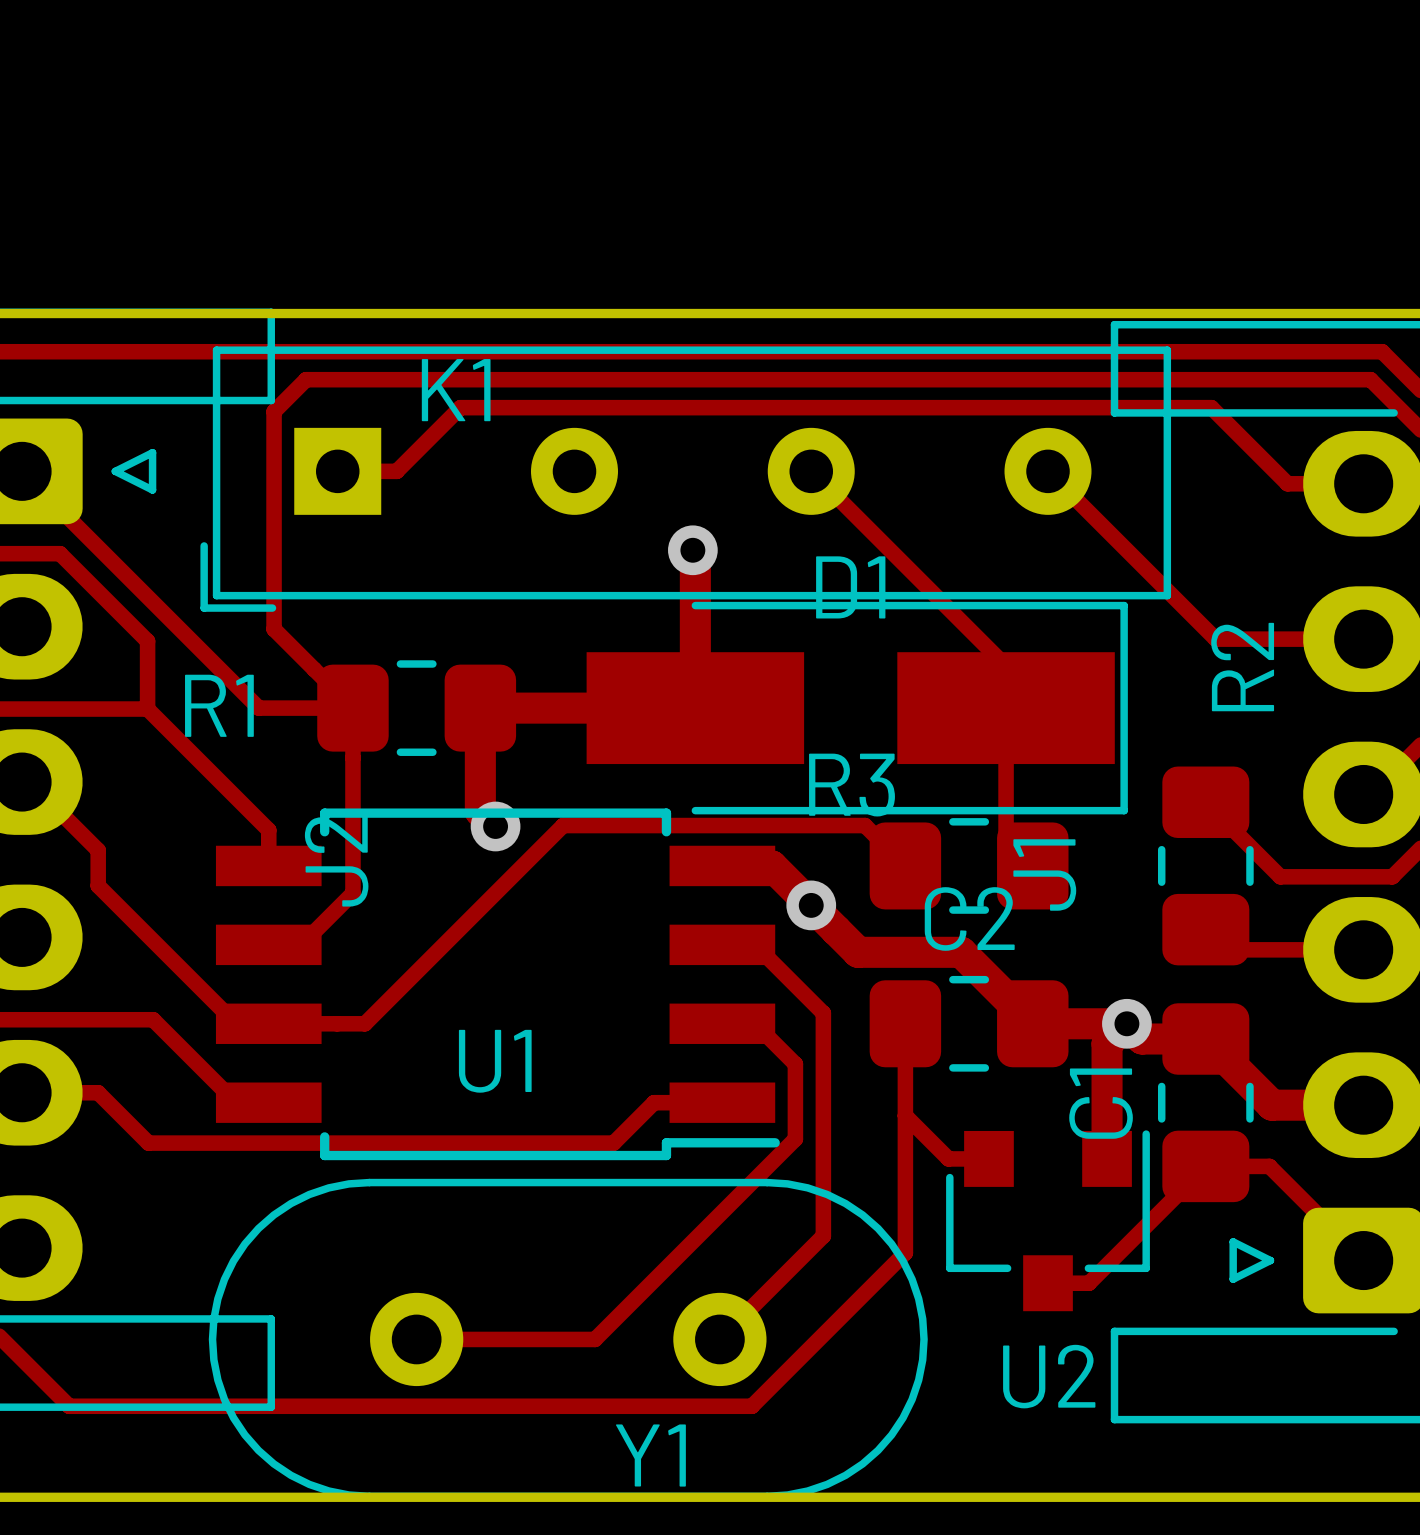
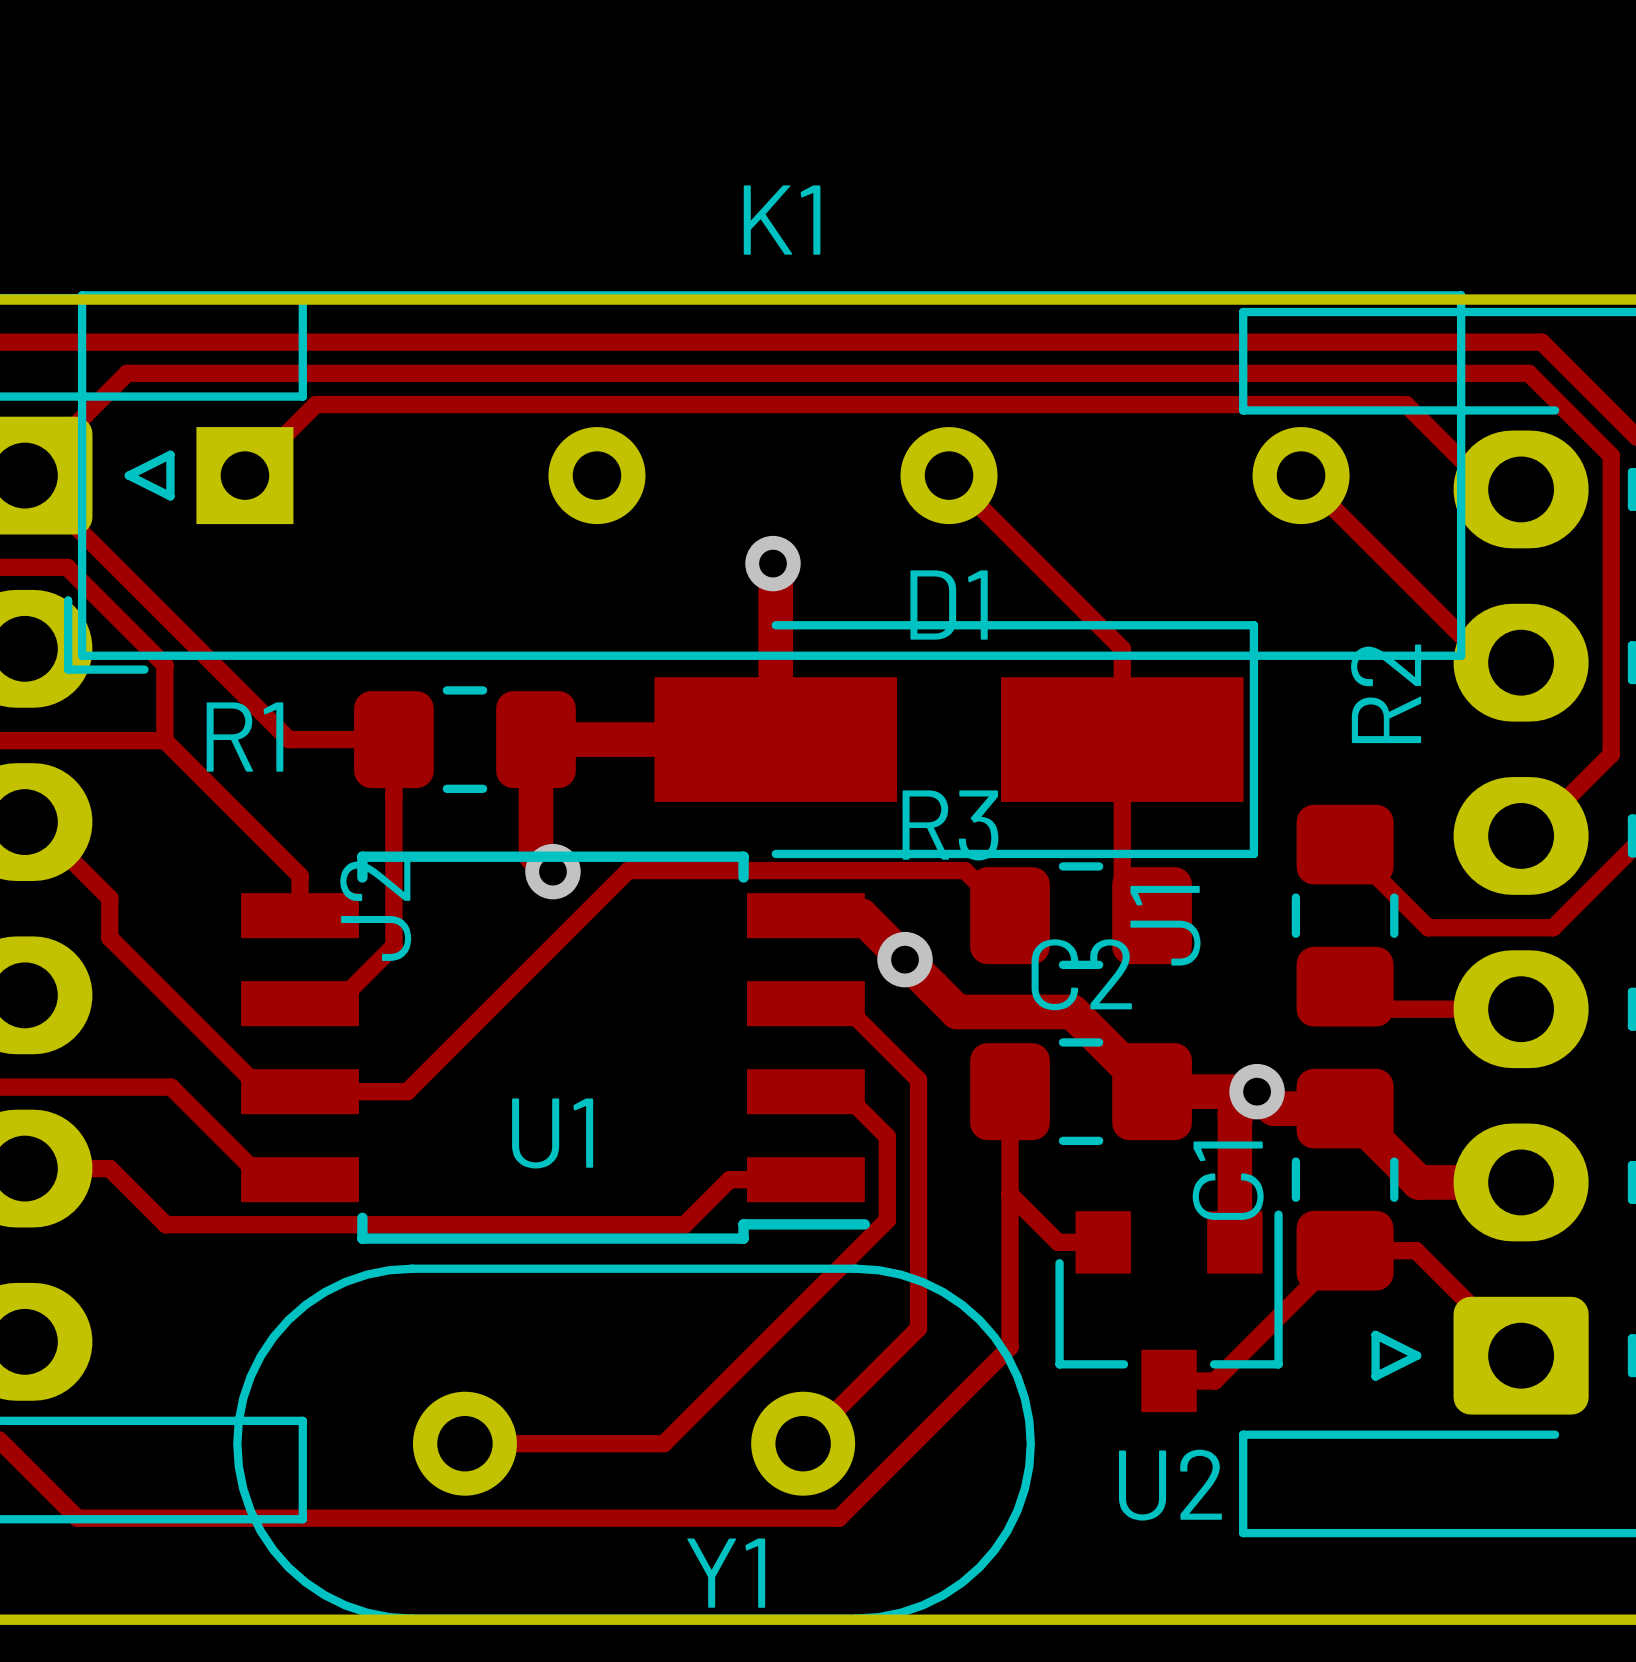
K1 footprint: [200, 346, 1172, 612] -> [64, 291, 1466, 674]
track: (306, 379) (274, 411) (274, 629) (352, 708) -> (341, 373) (127, 373) (24, 475)
K1 name position: K1 (456, 390) -> K1 (782, 220)
track: (460, 407) (396, 471) (337, 471) -> (513, 404) (315, 404) (244, 475)
track: (1211, 407) (1287, 483) (1336, 483) -> (1351, 404) (1406, 404) (1490, 489)
track: (811, 471) (1006, 666) -> (949, 475) (1122, 648) (1122, 692)
track: (1048, 471) (1215, 639) (1334, 639) -> (1301, 475) (1488, 662)

